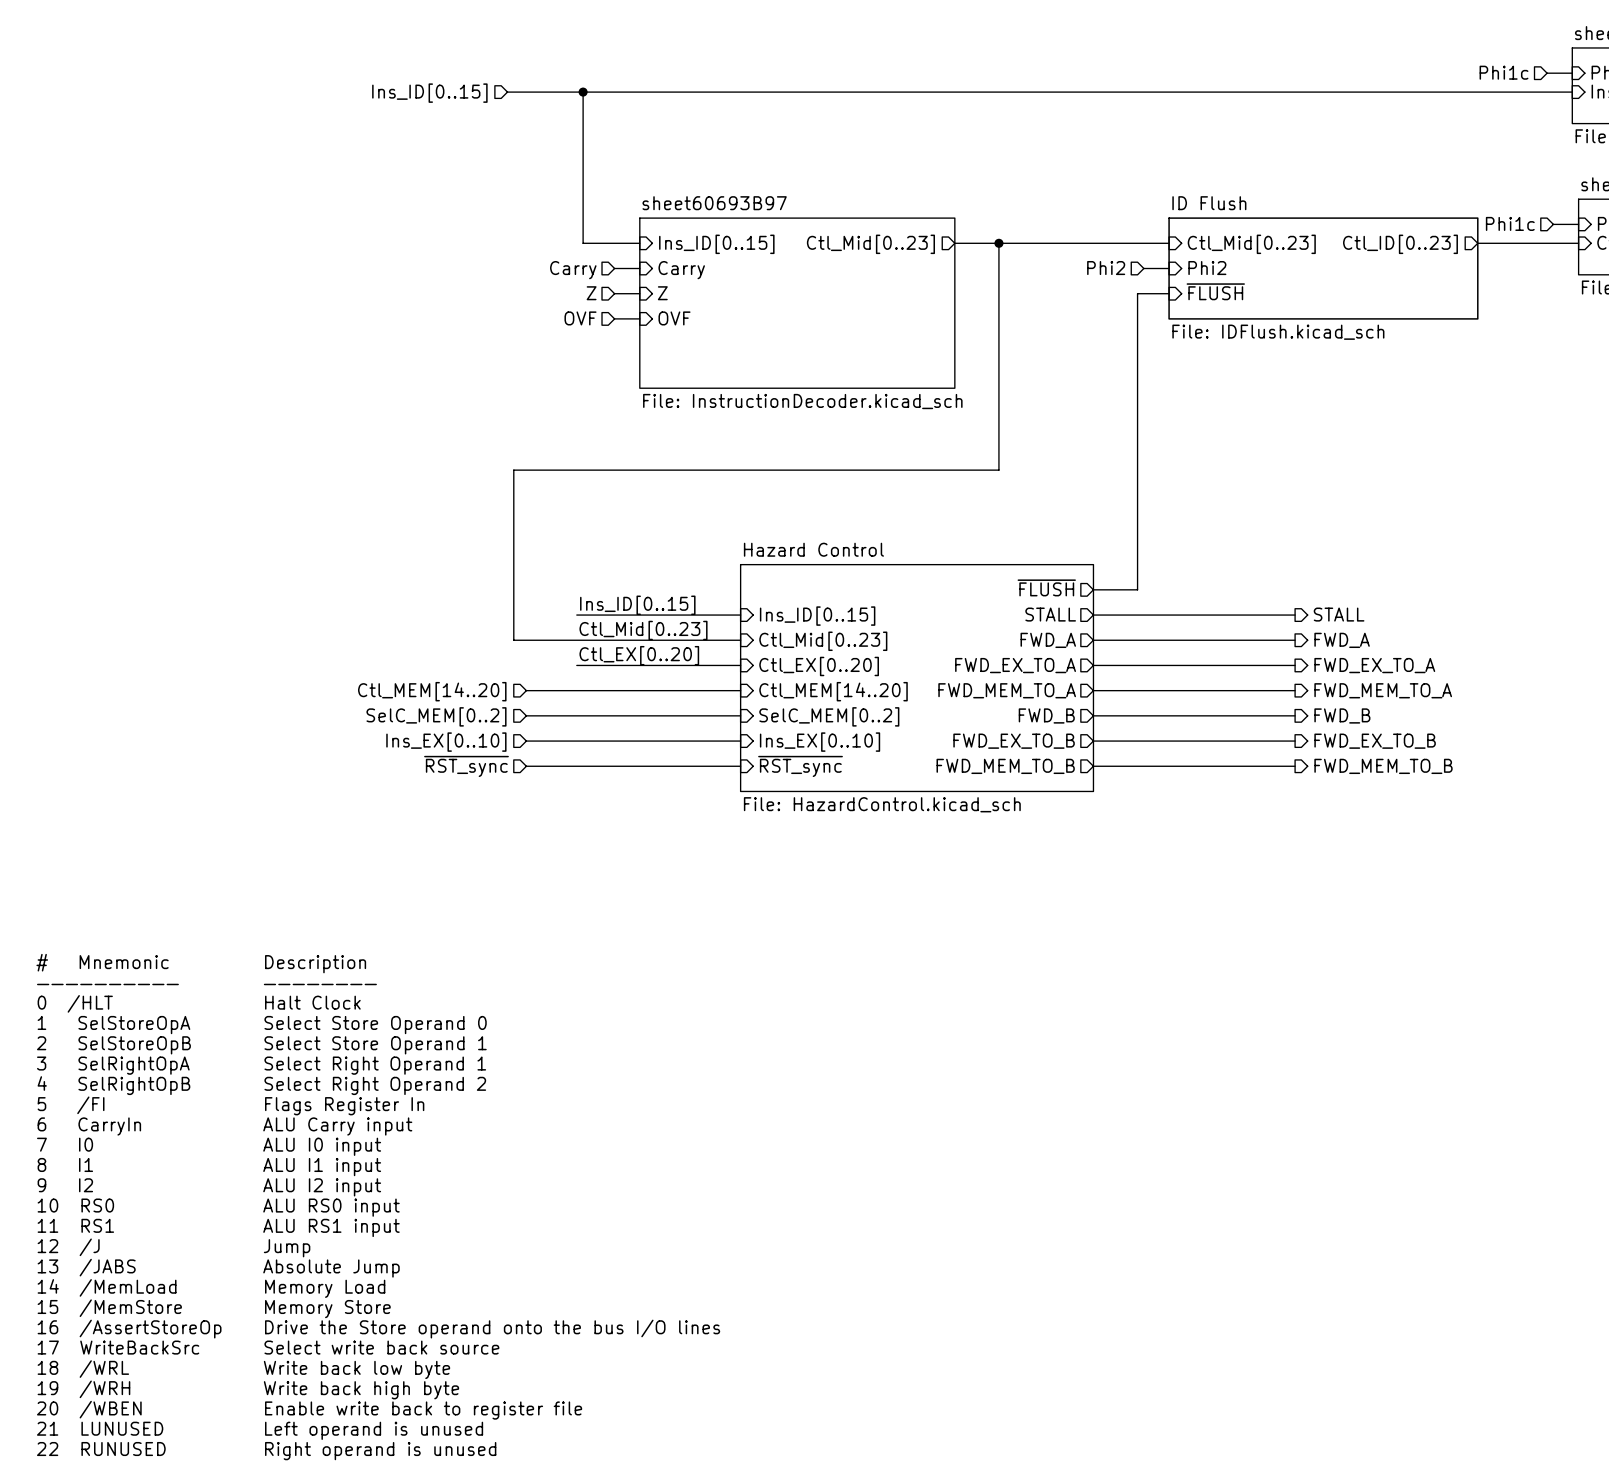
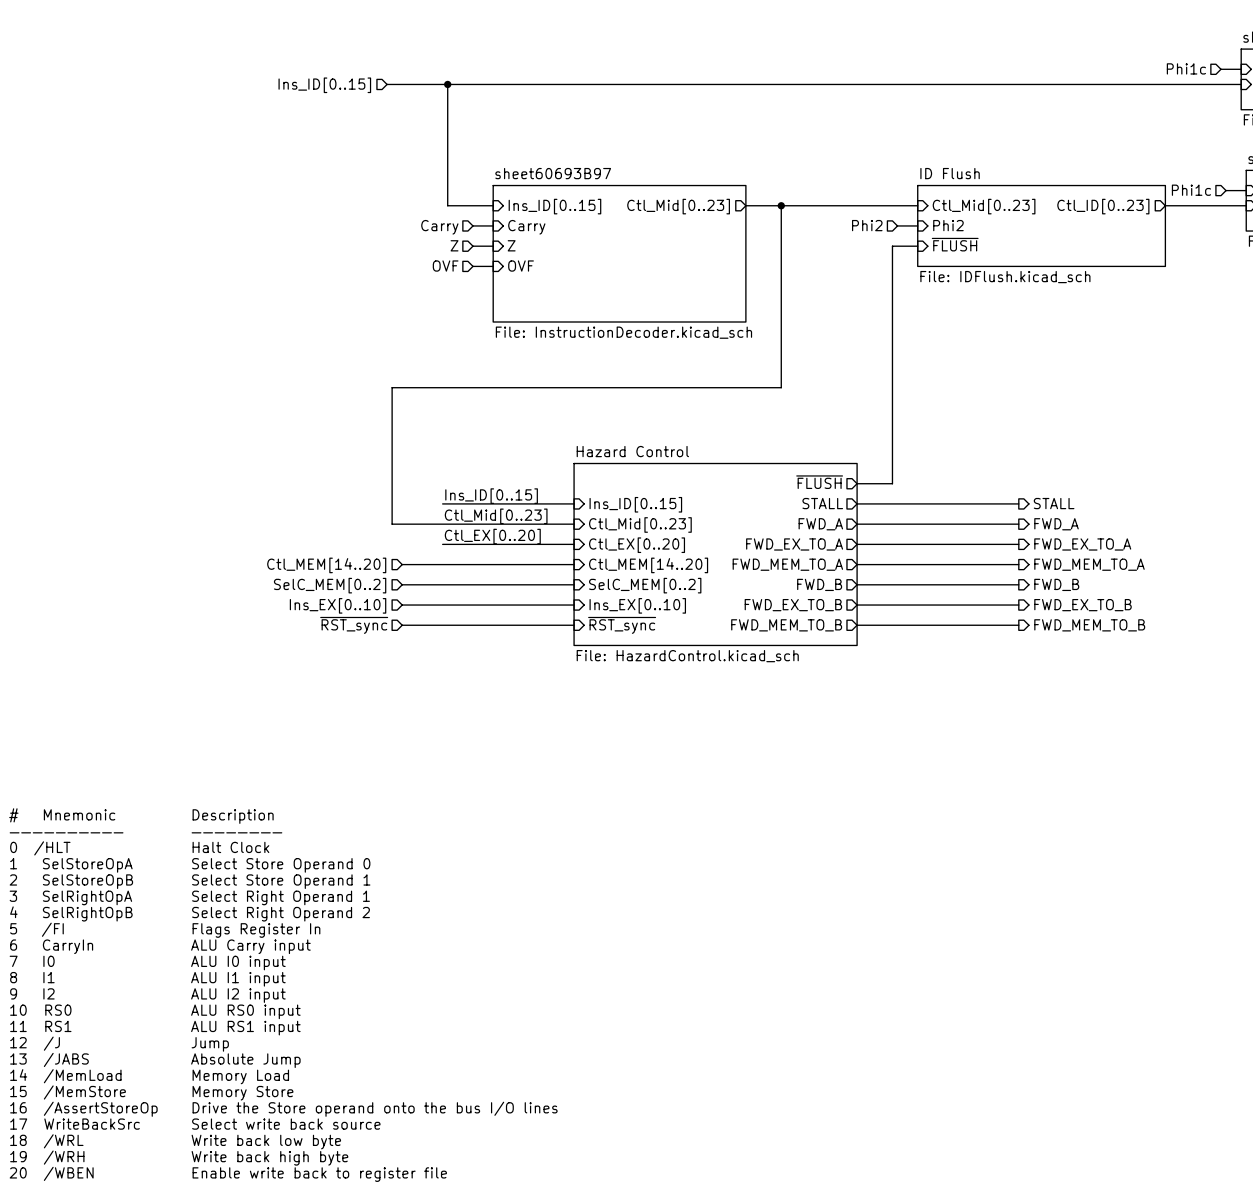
text: # Mnemonic (102, 962) -> none
text: Description (315, 964) -> none
text: —————————— (107, 984) -> none
text: ———————— (320, 984) -> none
text: Halt Clock (312, 1002) -> Description (233, 816)
text: 0 /HLT (75, 1003) -> # Mnemonic (62, 815)
text: 1 SelStoreOpA (113, 1025) -> —————————— (66, 832)
text: Select Store Operand 0 (375, 1025) -> ———————— (236, 832)
text: 2 SelStoreOpB (113, 1045) -> 0 /HLT (40, 848)
text: Select Store Operand 1 (375, 1045) -> Halt Clock (230, 847)
text: 3 SelRightOpA (113, 1065) -> 1 SelStoreOpA (71, 865)
text: Select Right Operand 1 (375, 1065) -> Select Store Operand 0 (281, 865)
text: 4 SelRightOpB (113, 1085) -> 2 SelStoreOpB (71, 881)
text: Select Right Operand 2 (375, 1085) -> Select Store Operand 1 (281, 881)
text: 5 /FI (71, 1105) -> 3 SelRightOpA (70, 897)
text: Flags Register In (344, 1106) -> Select Right Operand 1 (281, 897)
text: 6 CarryIn (89, 1126) -> 4 SelRightOpB (71, 913)
text: ALU Carry input (337, 1126) -> Select Right Operand 2 (281, 914)
text: 7 I0 (65, 1144) -> 5 /FI (36, 929)
text: ALU I0 input (322, 1146) -> Flags Register In (256, 930)
text: 8 I1 (65, 1164) -> 6 CarryIn (51, 946)
text: ALU I1 input (322, 1167) -> ALU Carry input (250, 946)
text: 9 I2 (65, 1185) -> 7 I0 (32, 961)
text: ALU I2 input (322, 1187) -> ALU I0 input (238, 963)
text: 10 RS0 (75, 1205) -> 8 I1 (32, 977)
text: ALU RS0 input (331, 1207) -> ALU I1 input (238, 979)
text: 11 RS1 (75, 1225) -> 9 I2 (32, 993)
text: ALU RS1 input (331, 1227) -> ALU I2 input (238, 995)
text: 12 /J (68, 1247) -> 10 RS0 (40, 1010)
text: Jump (287, 1248) -> ALU RS0 input (245, 1011)
text: 13 /JABS (86, 1267) -> 11 RS1 (40, 1026)
text: Absolute Jump (331, 1268) -> ALU RS1 input (245, 1028)
text: 14 /MemLoad (107, 1287) -> 12 /J (35, 1043)
text: Memory Load (325, 1288) -> Jump (210, 1044)
text: 15 /MemStore (109, 1308) -> 13 /JABS (49, 1059)
text: Memory Store (327, 1309) -> Absolute Jump (245, 1060)
text: 16 /AssertStoreOp (129, 1329) -> 14 /MemLoad (65, 1076)
text: Drive the Store operand onto the bus I/O lines (492, 1329) -> Memory Load (240, 1076)
text: 17 WriteBackSrc (118, 1347) -> 15 /MemStore (68, 1092)
text: Select write back source (381, 1347) -> Memory Store (242, 1093)
text: 18 /WRL (83, 1369) -> 16 /AssertStoreOp (83, 1109)
text: Write back low byte (356, 1369) -> Drive the Store operand onto the bus I/O lines (375, 1109)
text: 19 /WRH (83, 1389) -> 17 WriteBackSrc (74, 1124)
text: Write back high byte (361, 1390) -> Select write back source (286, 1124)
text: 20 /WBEN (89, 1409) -> 18 /WRL (46, 1141)
text: Enable write back to register file (423, 1410) -> Write back low byte (266, 1142)
text: 21 LUNUSED (100, 1428) -> 19 /WRH (47, 1157)
text: Left operand is unused (374, 1430) -> Write back high byte (269, 1158)
text: 22 RUNUSED (101, 1449) -> 20 /WBEN (51, 1173)
text: Right operand is unused (380, 1451) -> Enable write back to register file (319, 1174)

